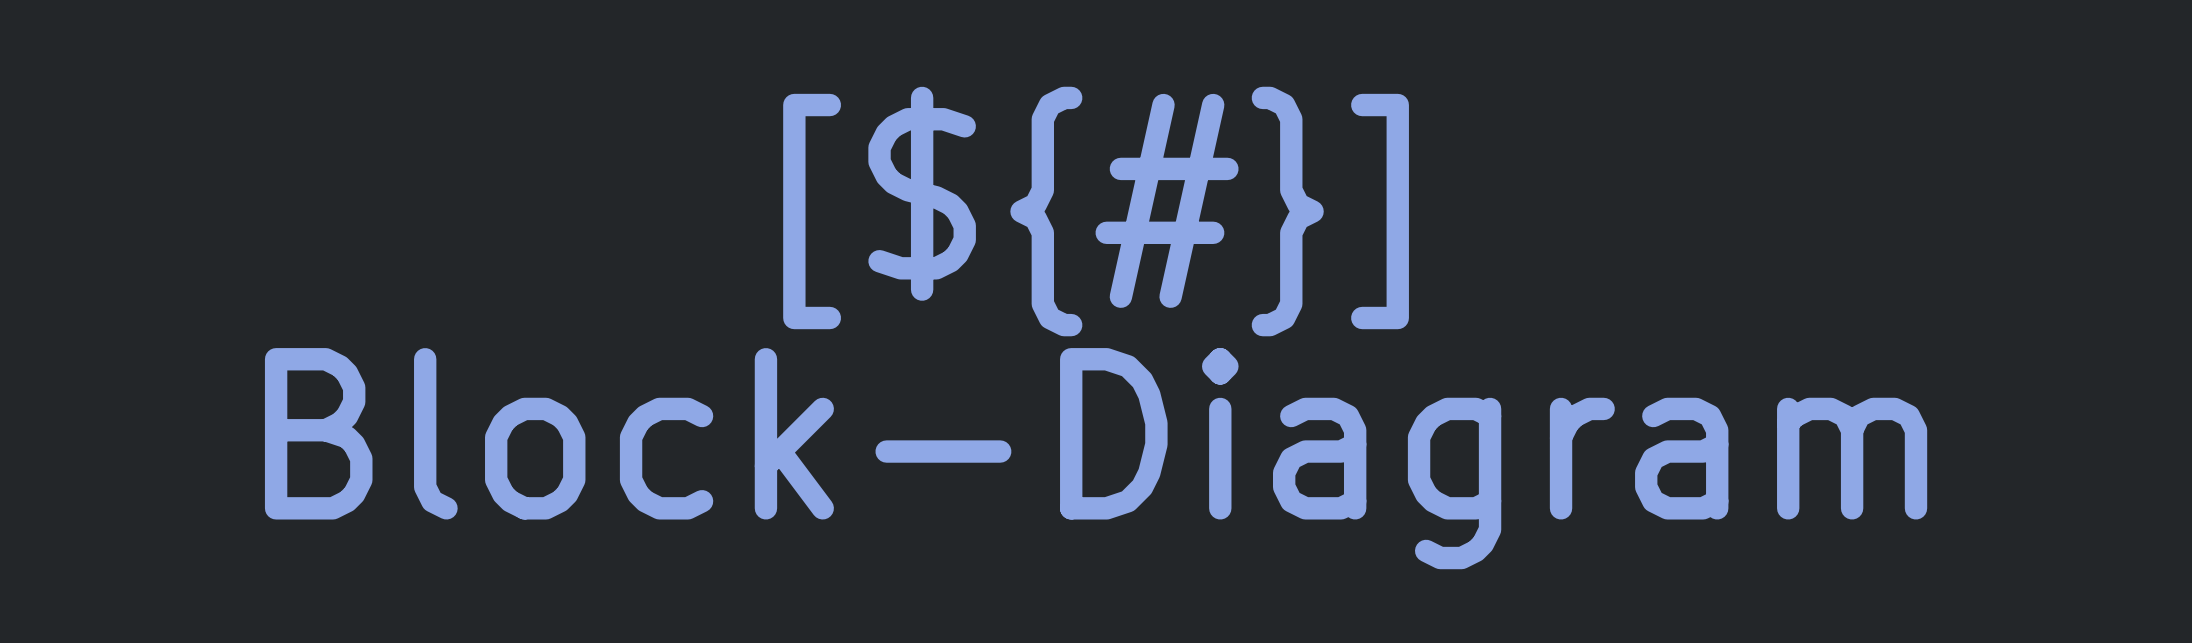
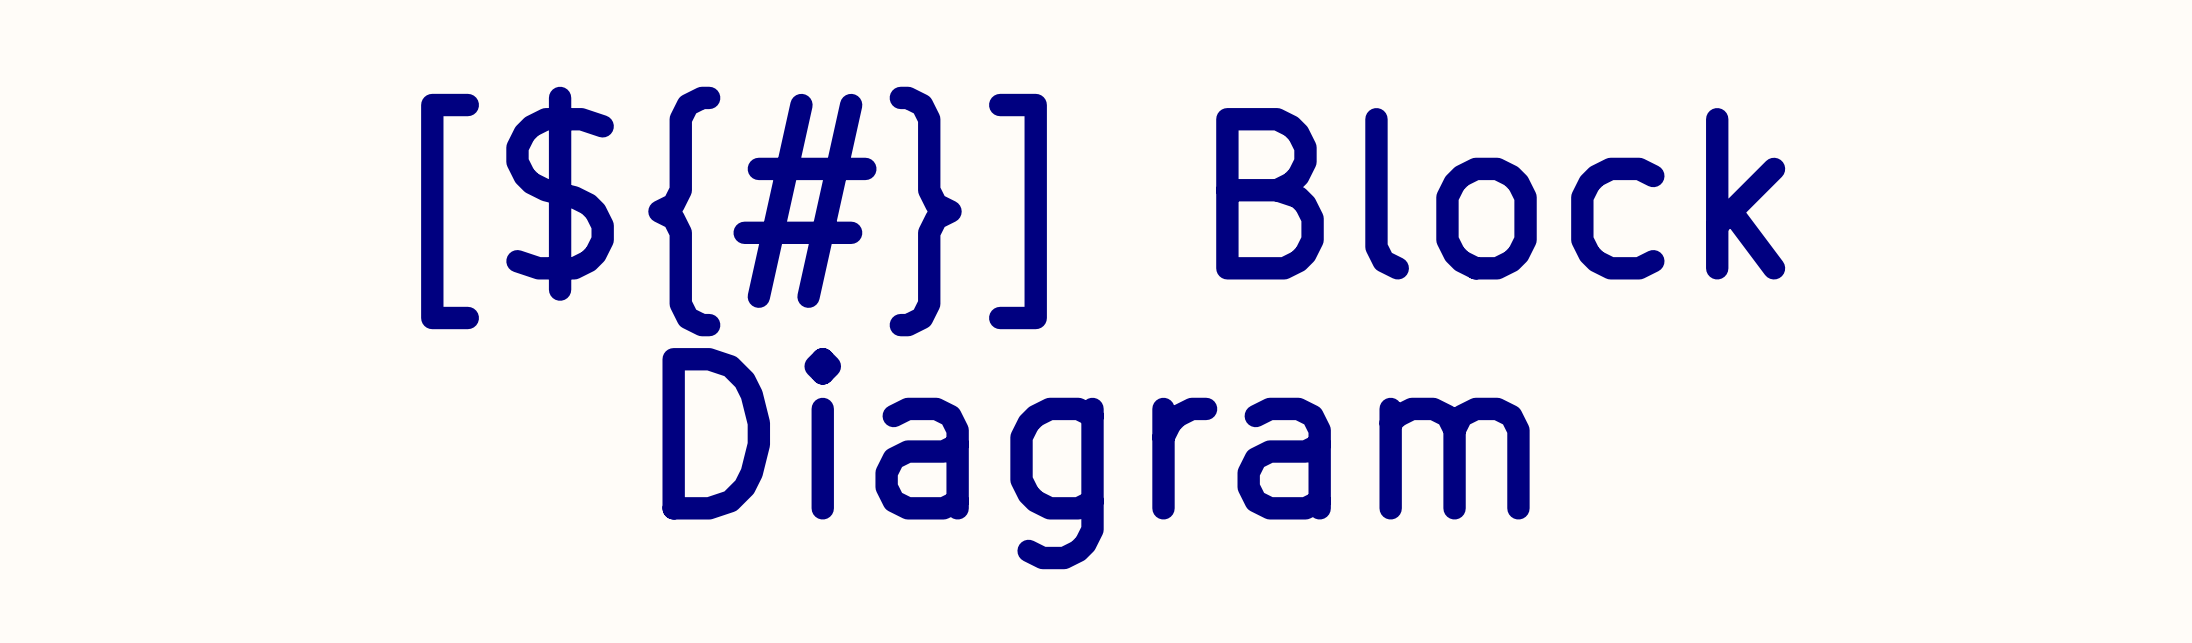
text: [${#}] (1096, 211) -> [${#}] Block (1103, 211)
text: Block-Diagram (1096, 458) -> Diagram (1096, 458)

